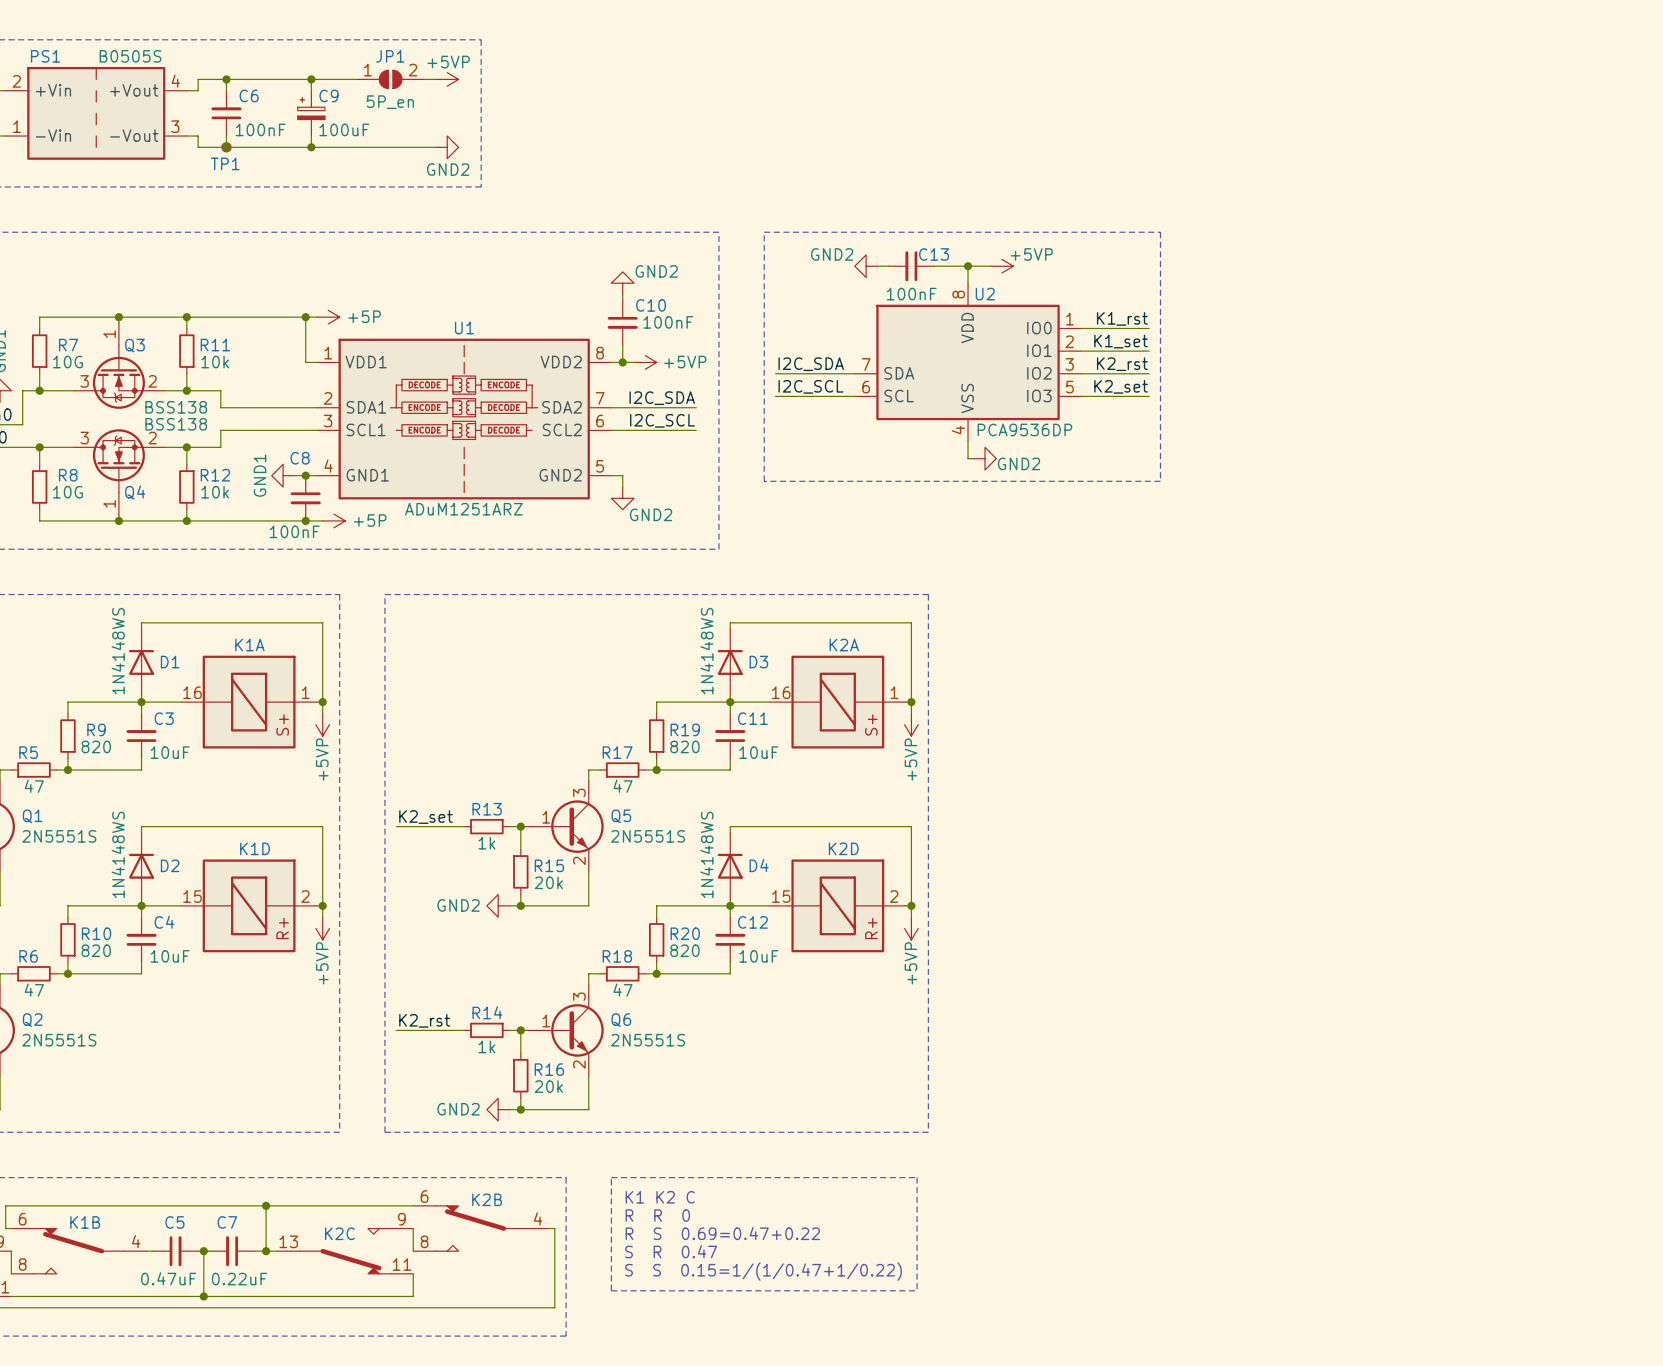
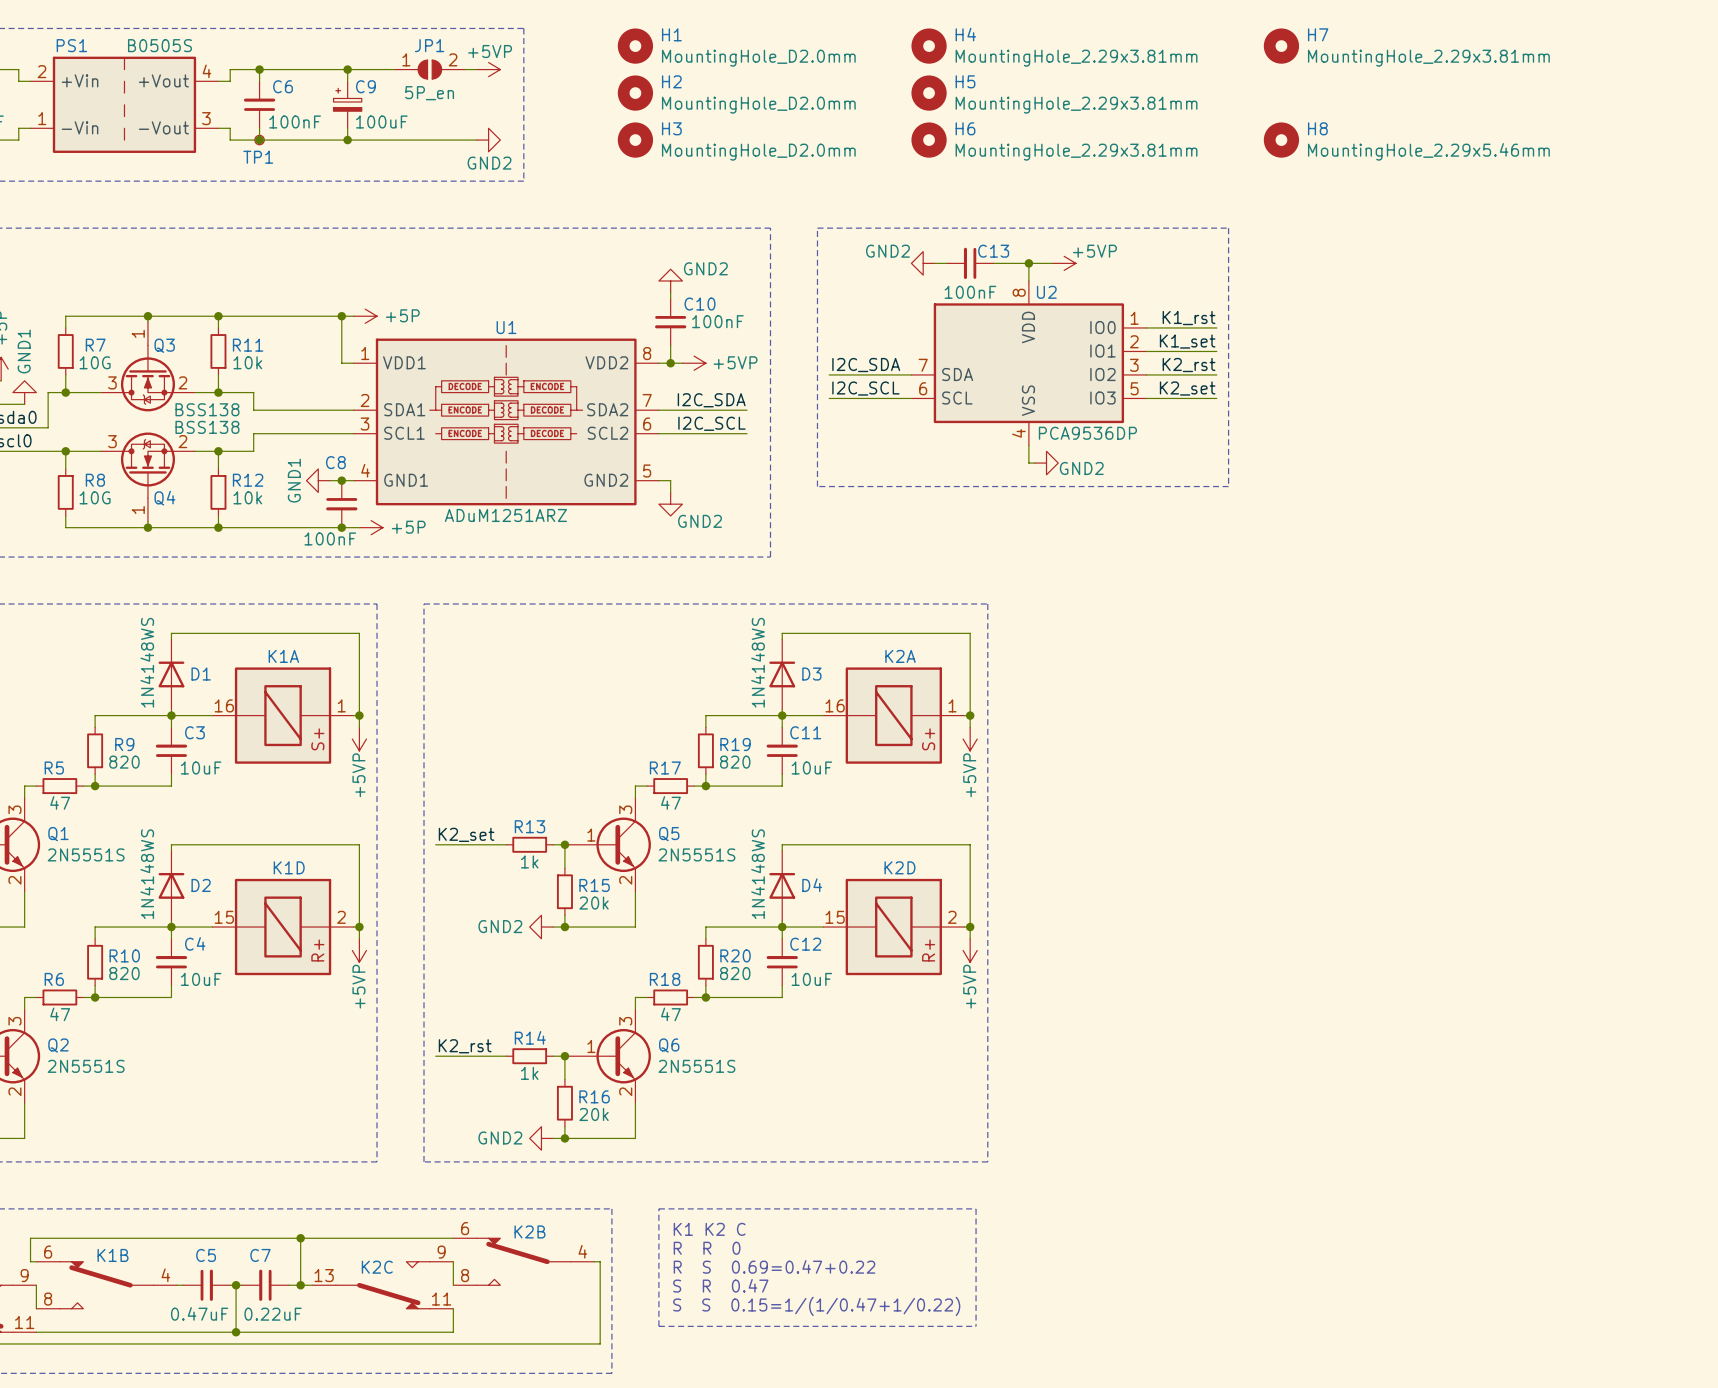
H1: none -> MountingHole_D2.0mm (635, 46)
H4: none -> MountingHole_2.29x3.81mm (929, 46)
H7: none -> MountingHole_2.29x3.81mm (1281, 46)
H2: none -> MountingHole_D2.0mm (635, 93)
H5: none -> MountingHole_2.29x3.81mm (929, 93)
H3: none -> MountingHole_D2.0mm (635, 140)
H6: none -> MountingHole_2.29x3.81mm (929, 140)
H8: none -> MountingHole_2.29x5.46mm (1281, 140)

